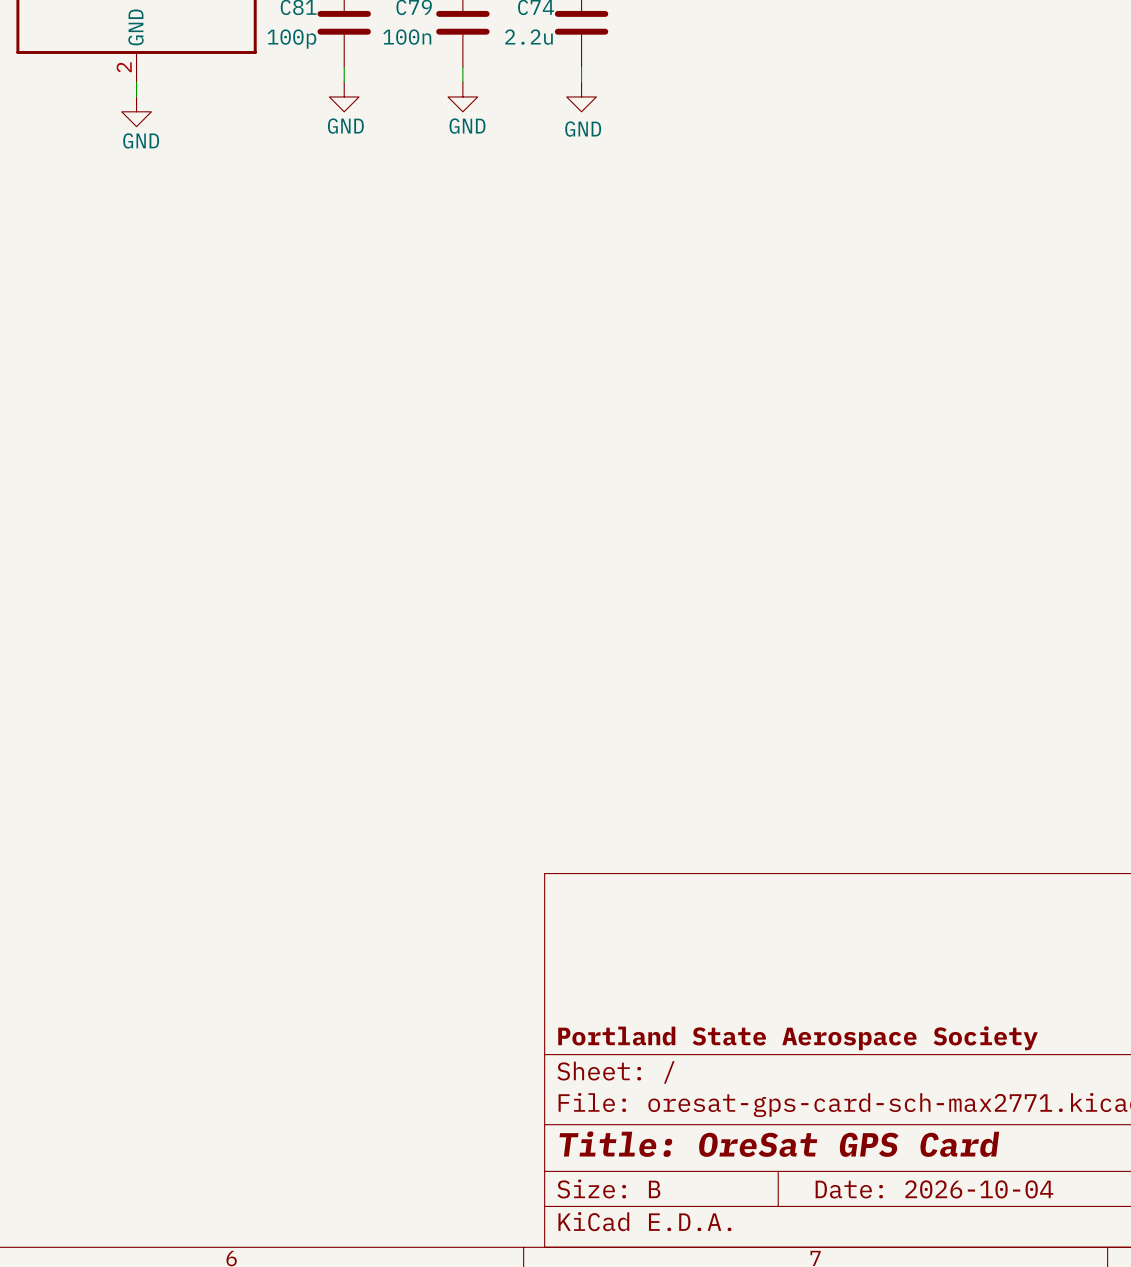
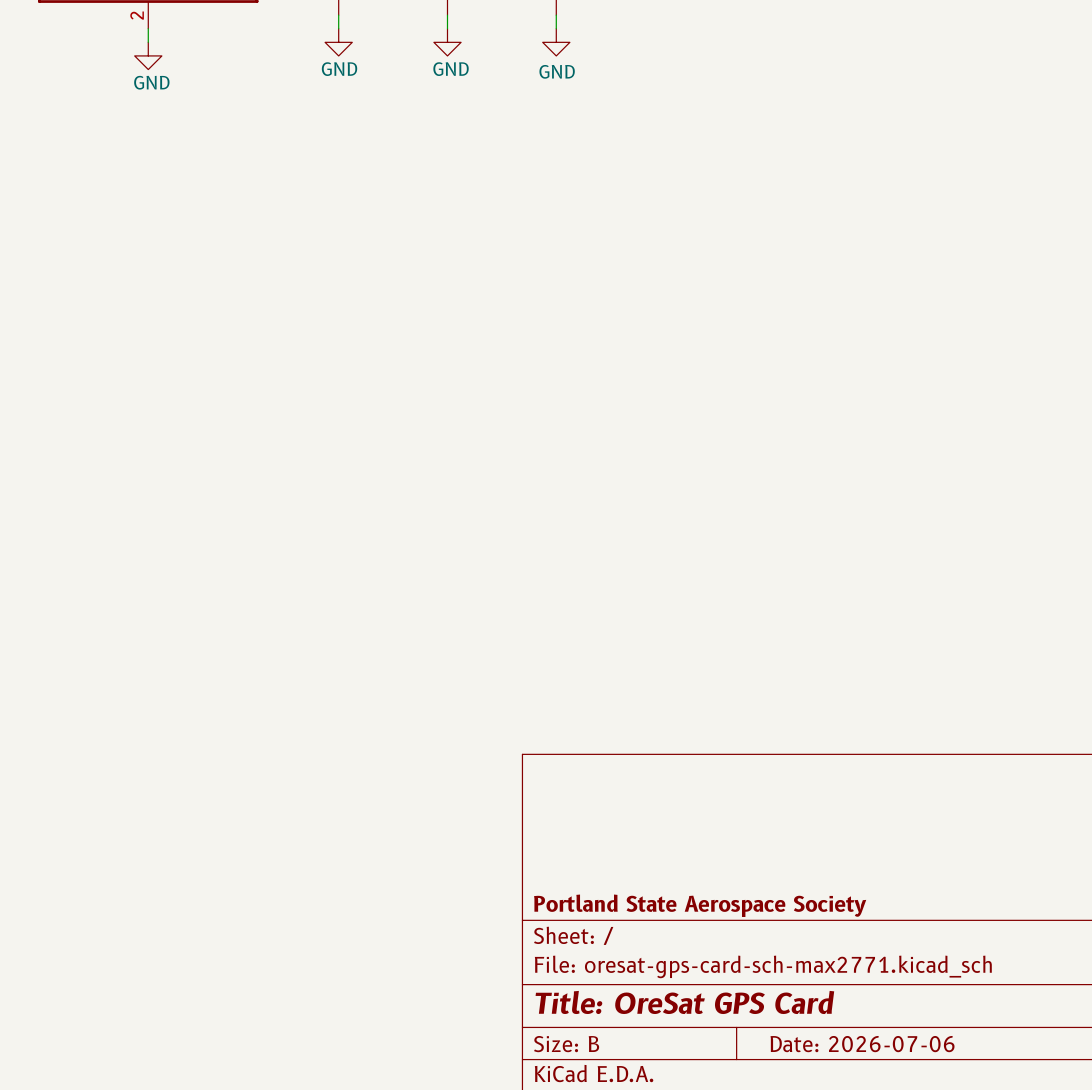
title block: Date: 2026-10-04 (934, 1189) -> Date: 2026-07-06 (862, 1044)

